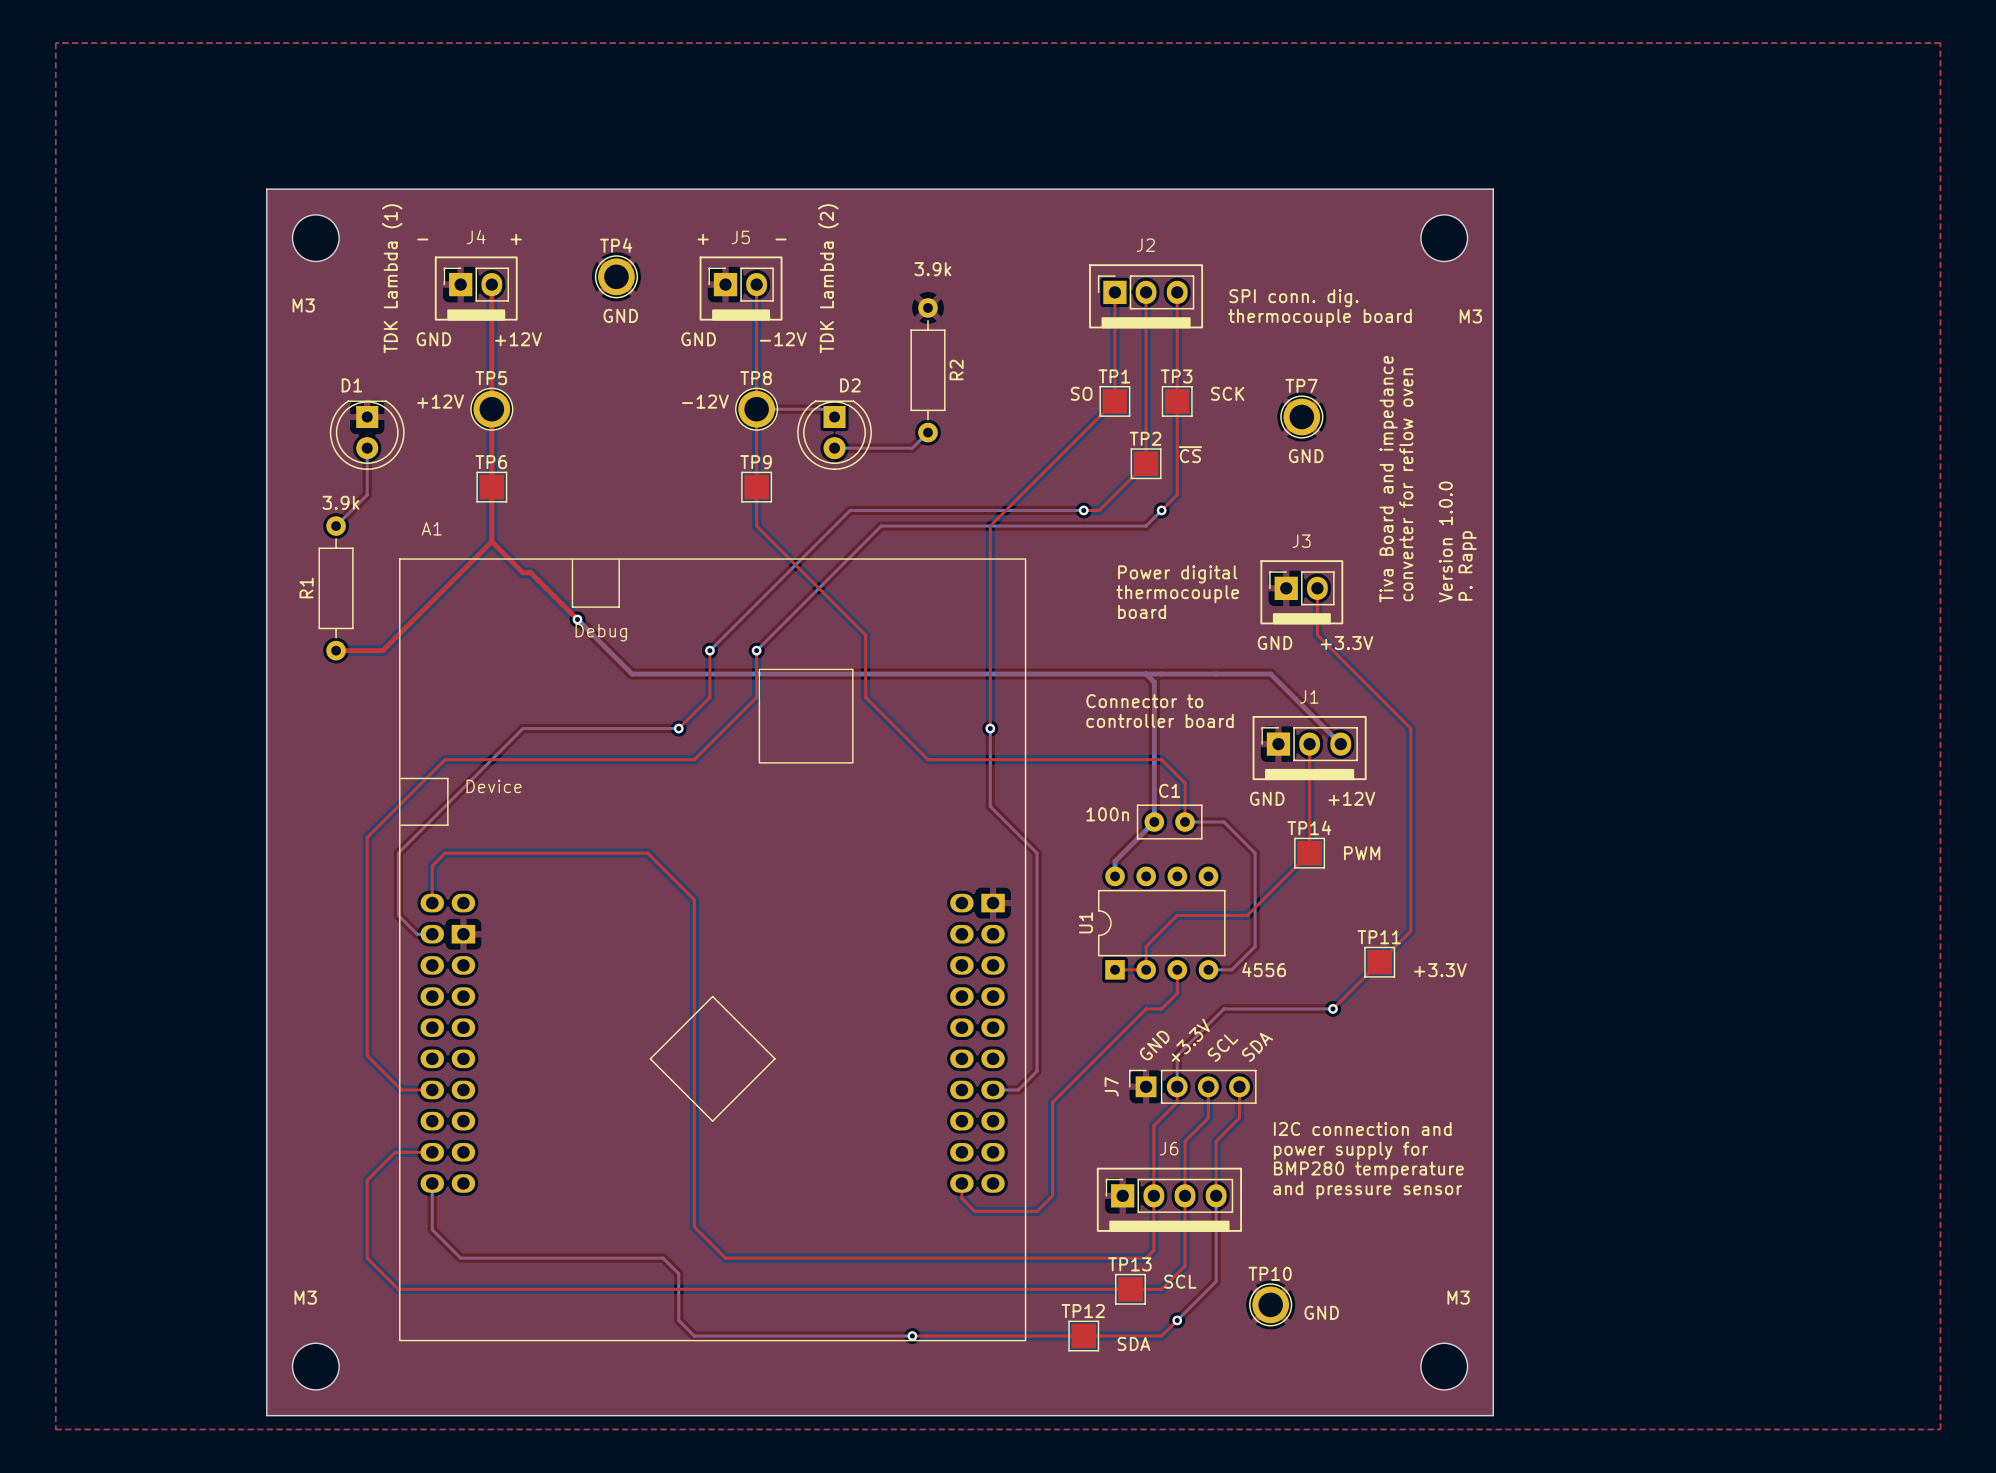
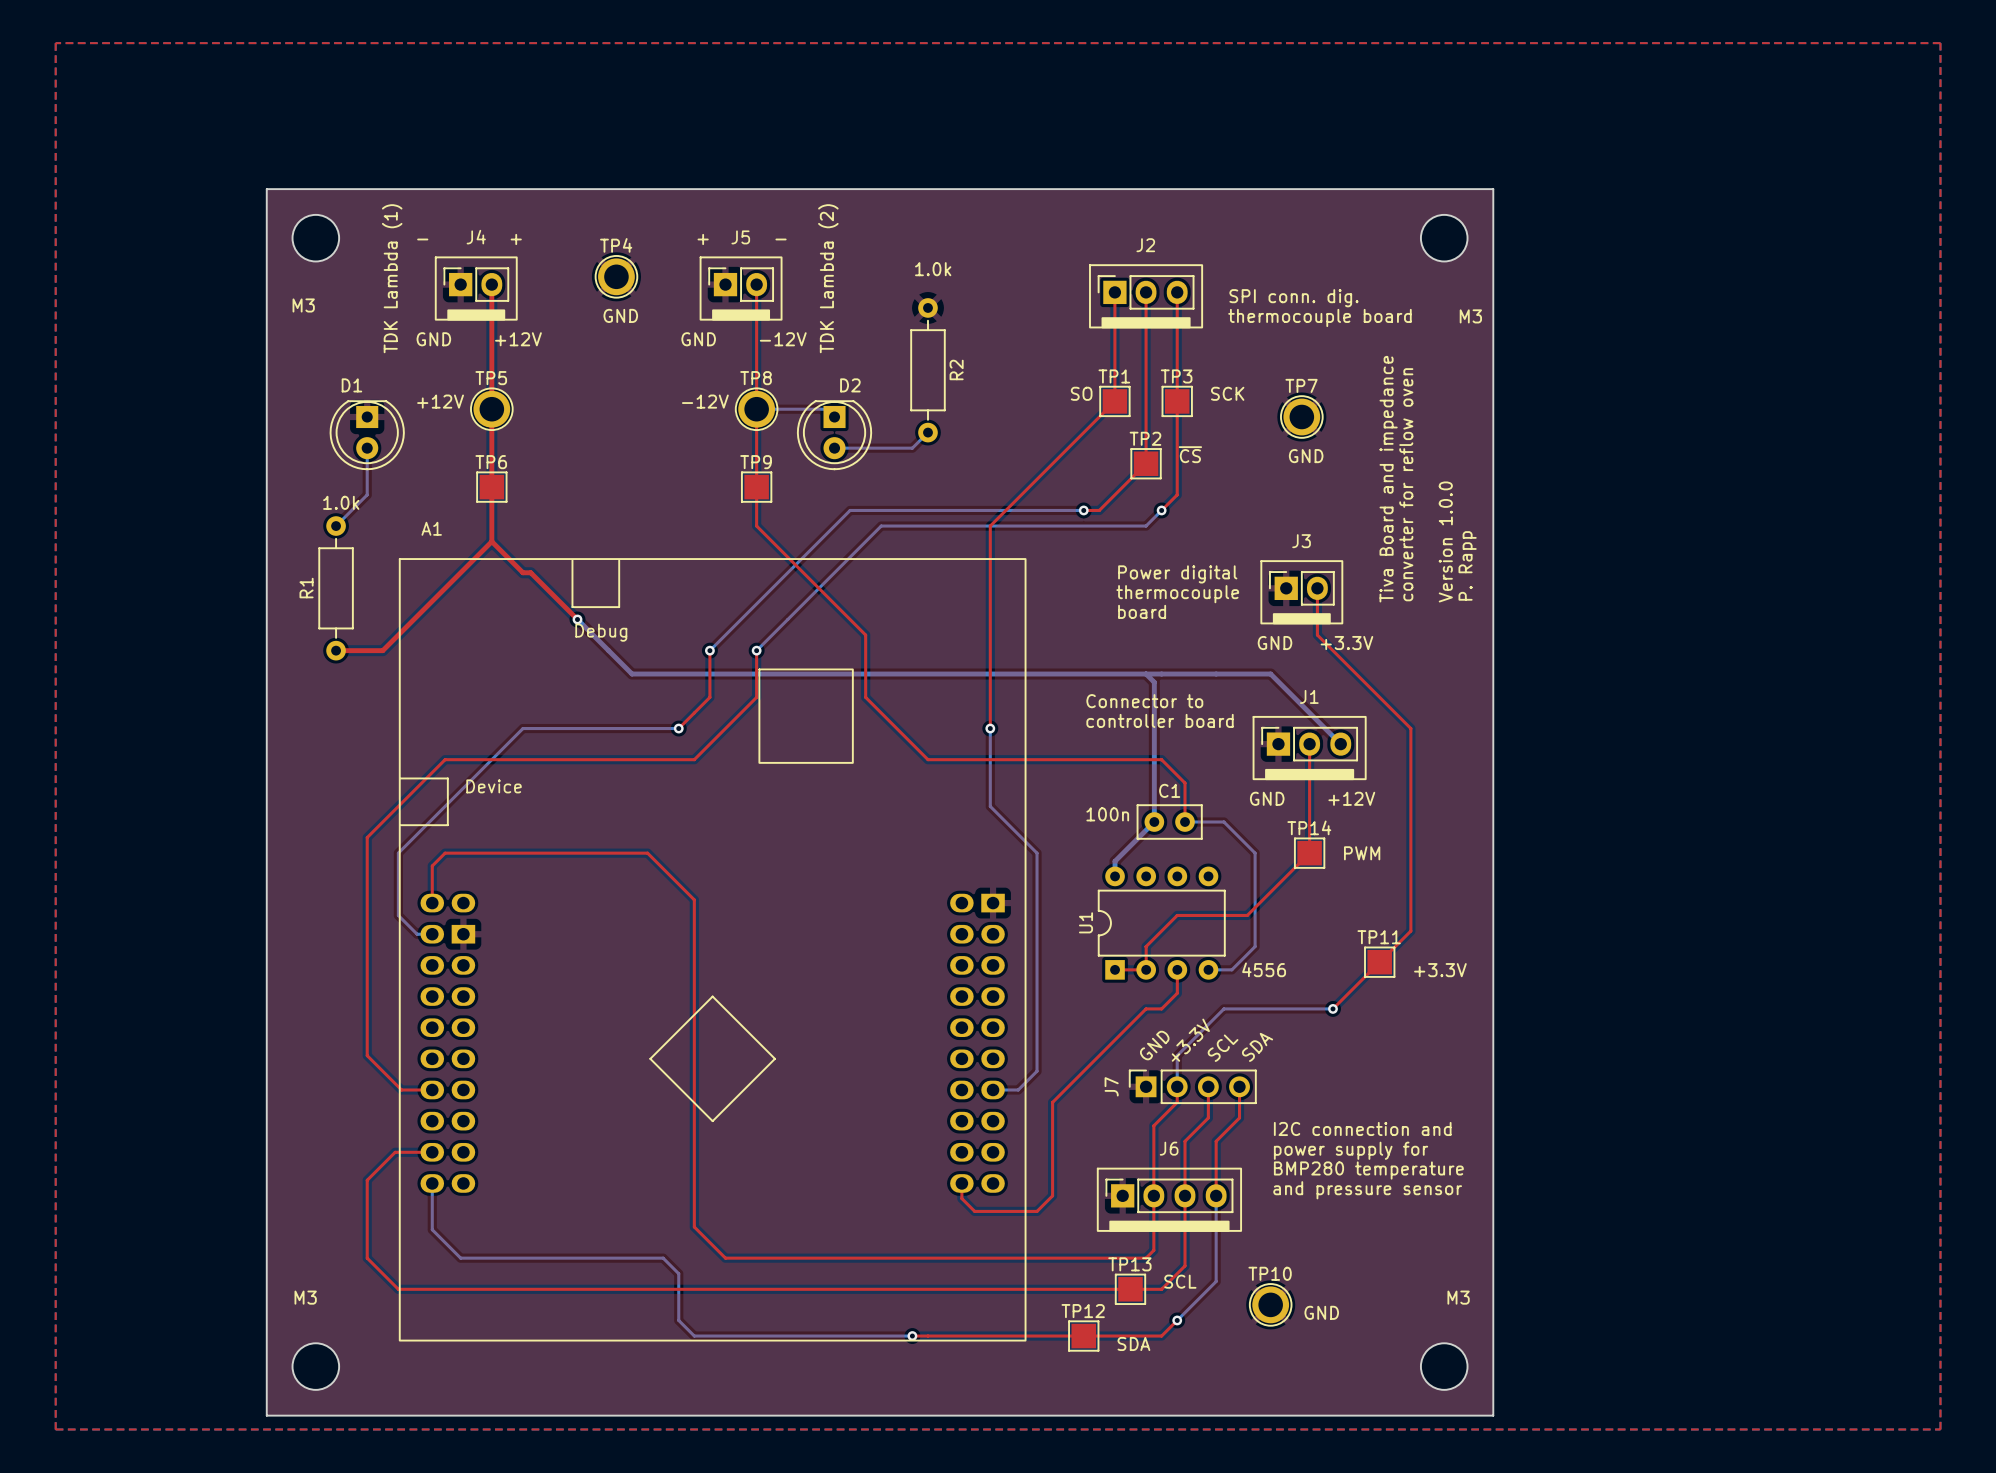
text: 3.9k (932, 269) -> 1.0k (933, 269)
text: 3.9k (340, 502) -> 1.0k (341, 502)

